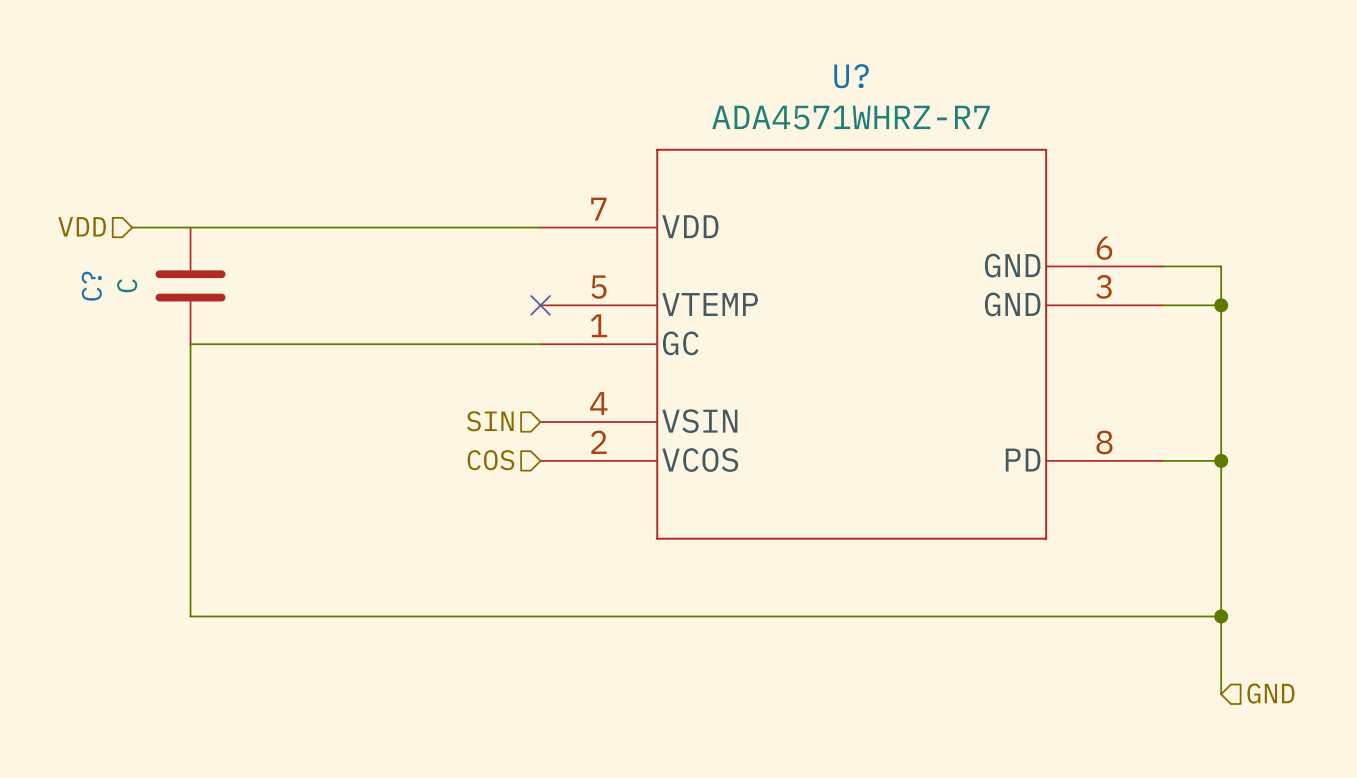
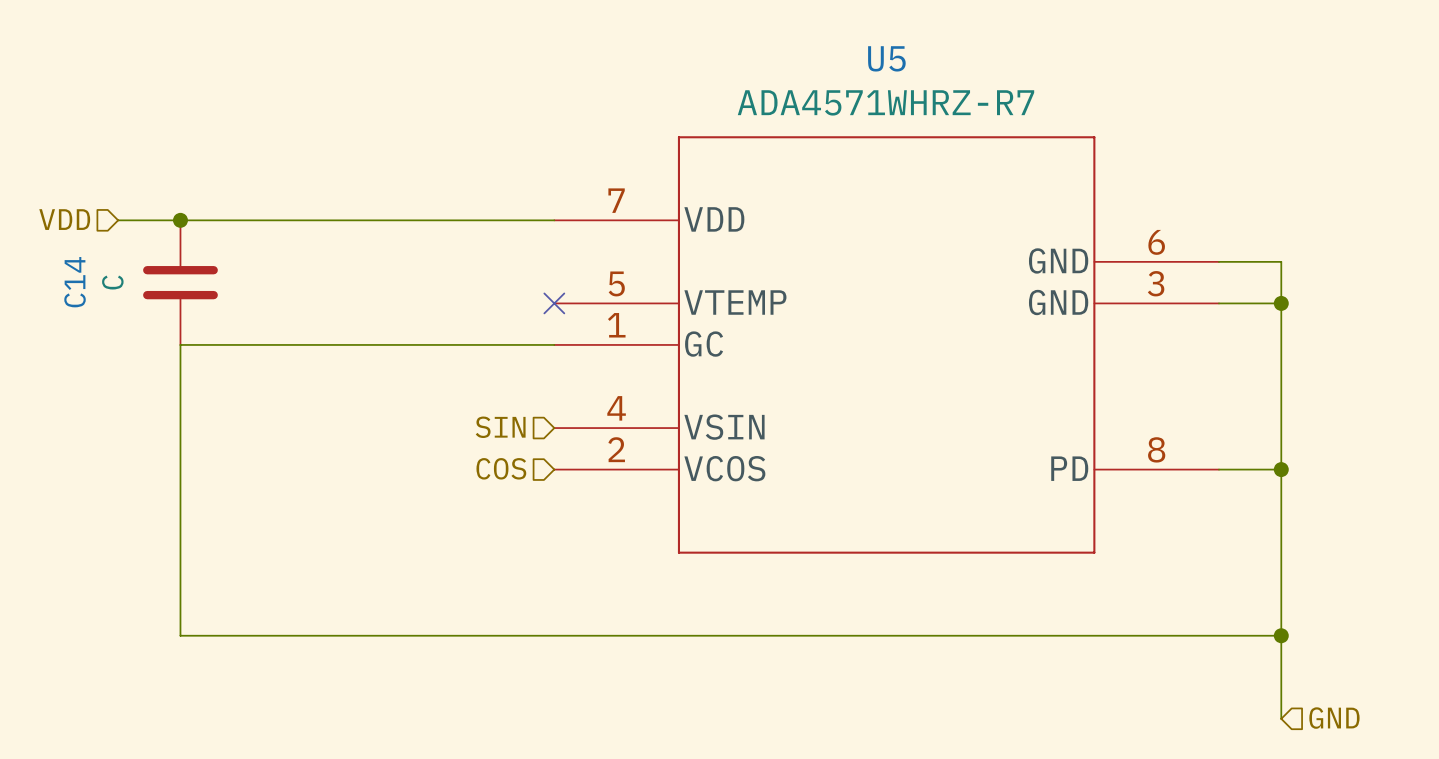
U? name: U? (851, 76) -> U5 (886, 58)
junction: none -> (180, 220)
C? name: C? (91, 286) -> C14 (75, 282)

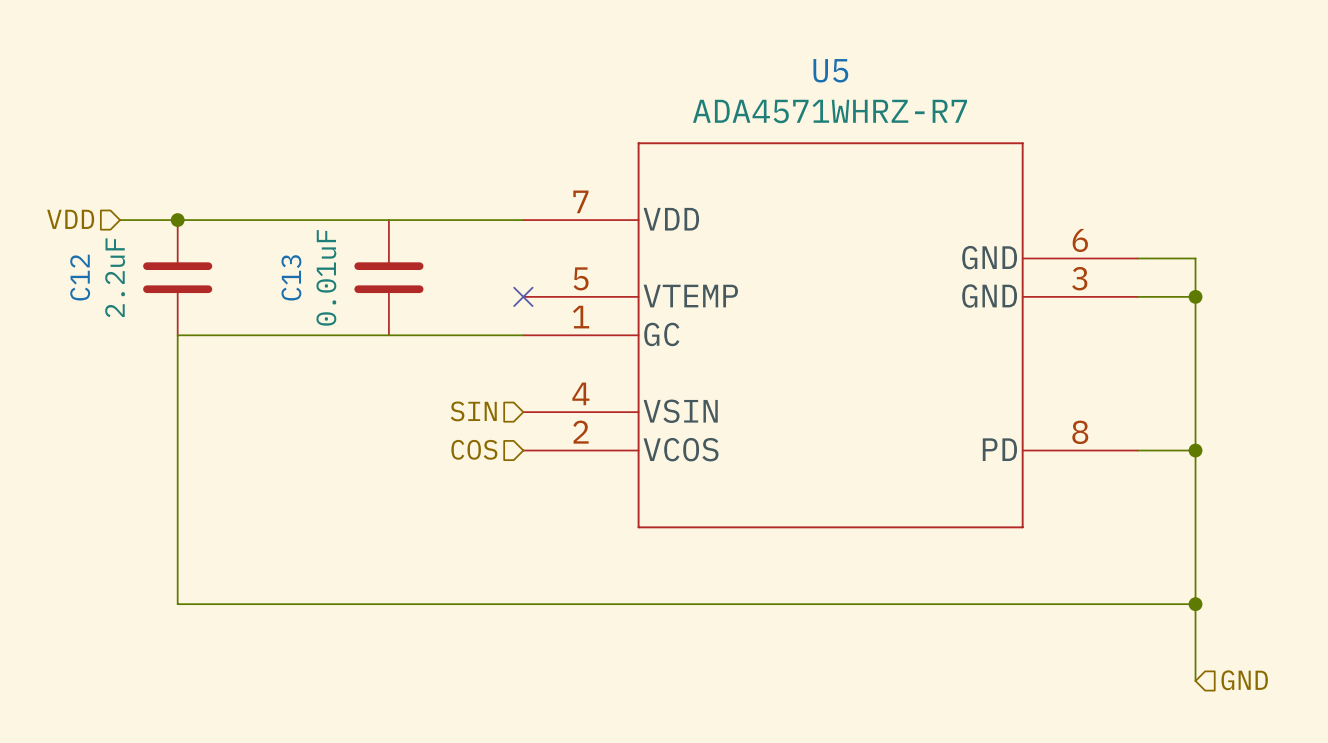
C14 name: C14 (75, 282) -> C12 (80, 277)
C14 value: C (112, 282) -> 2.2uF (115, 277)
C13: none -> 0.01uF (388, 277)

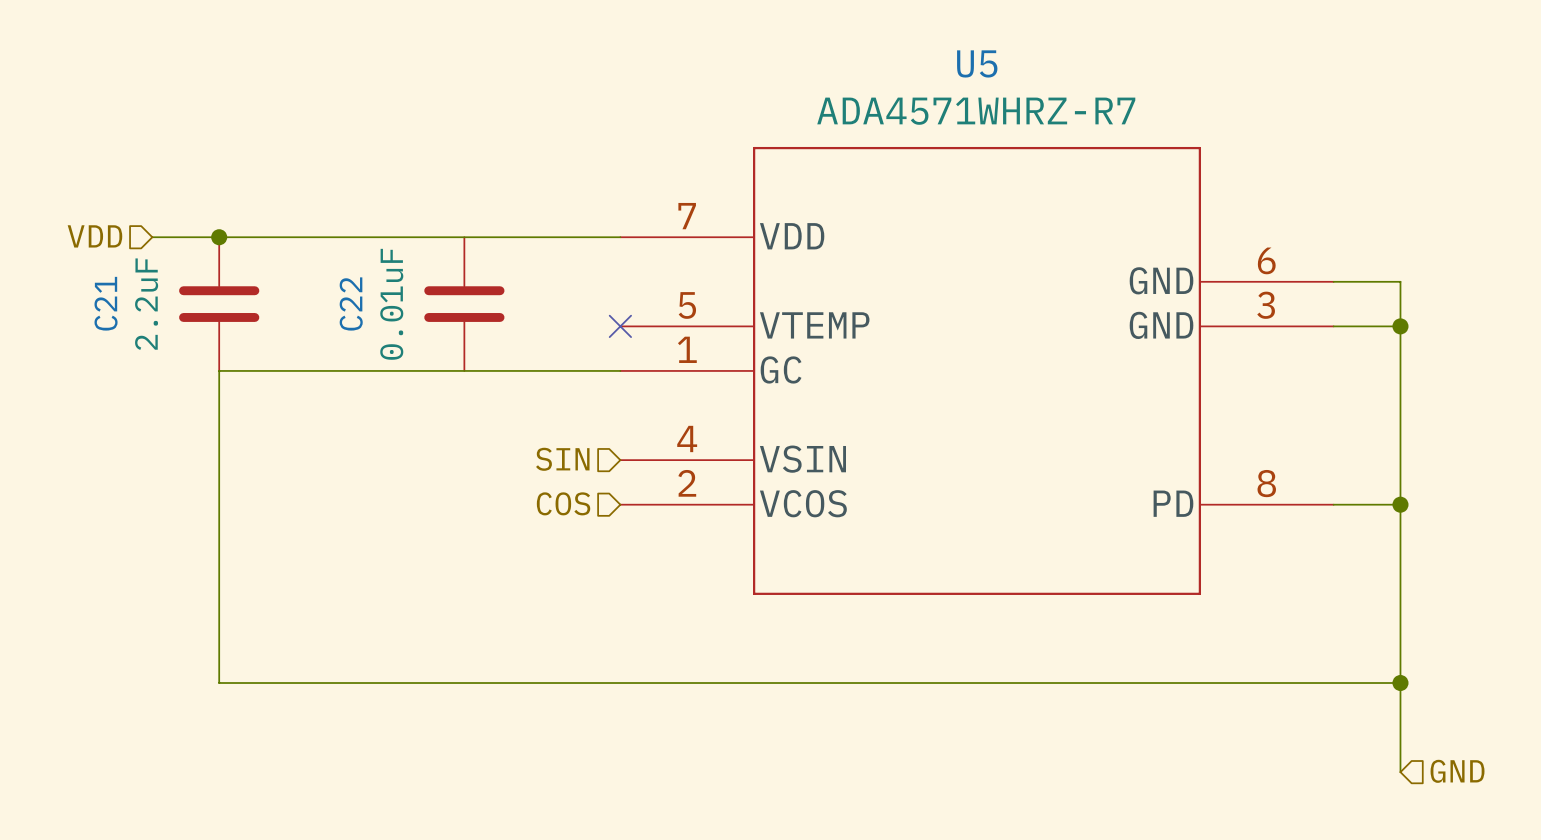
C12 name: C12 (80, 277) -> C21 (106, 303)
C13 name: C13 (291, 277) -> C22 (351, 303)

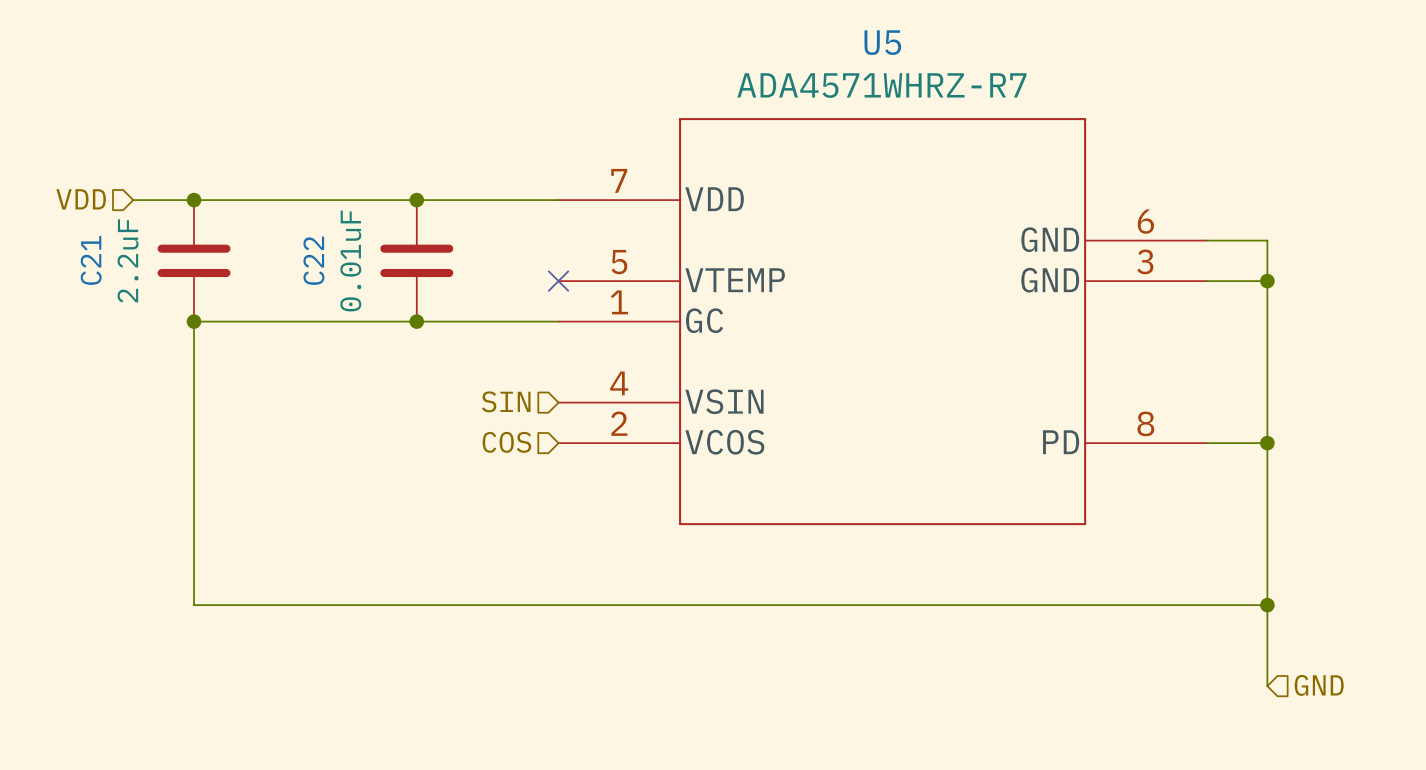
junction: none -> (416, 200)
junction: none -> (194, 321)
junction: none -> (416, 321)

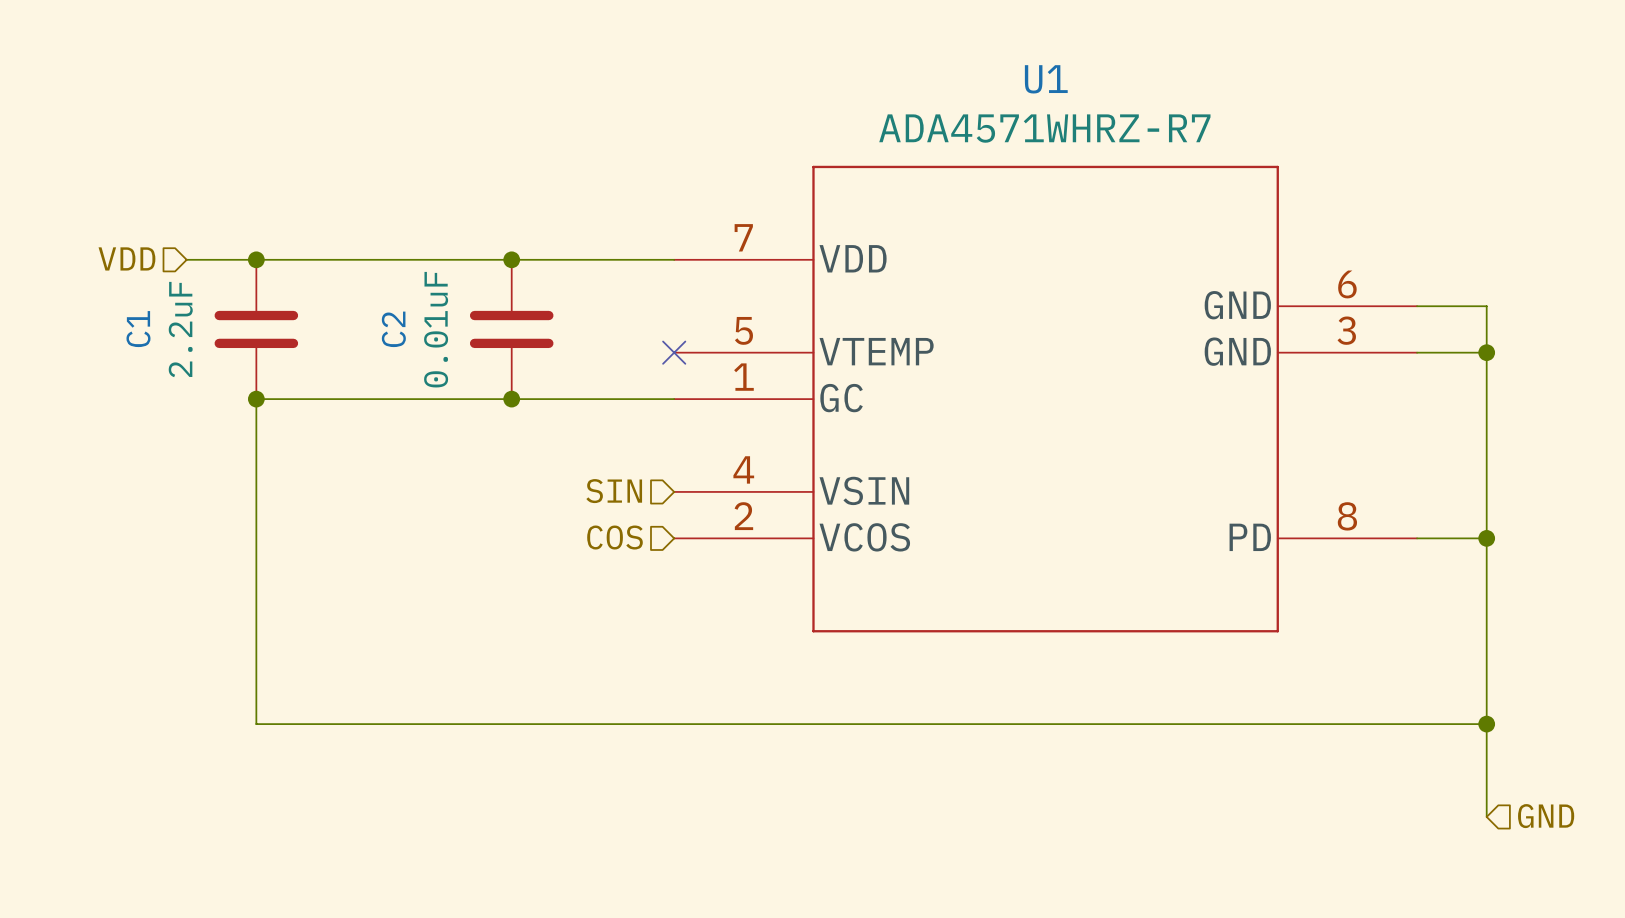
U5 name: U5 (882, 42) -> U1 (1046, 79)
C21 name: C21 (91, 260) -> C1 (138, 329)
C22 name: C22 (313, 260) -> C2 (393, 329)

